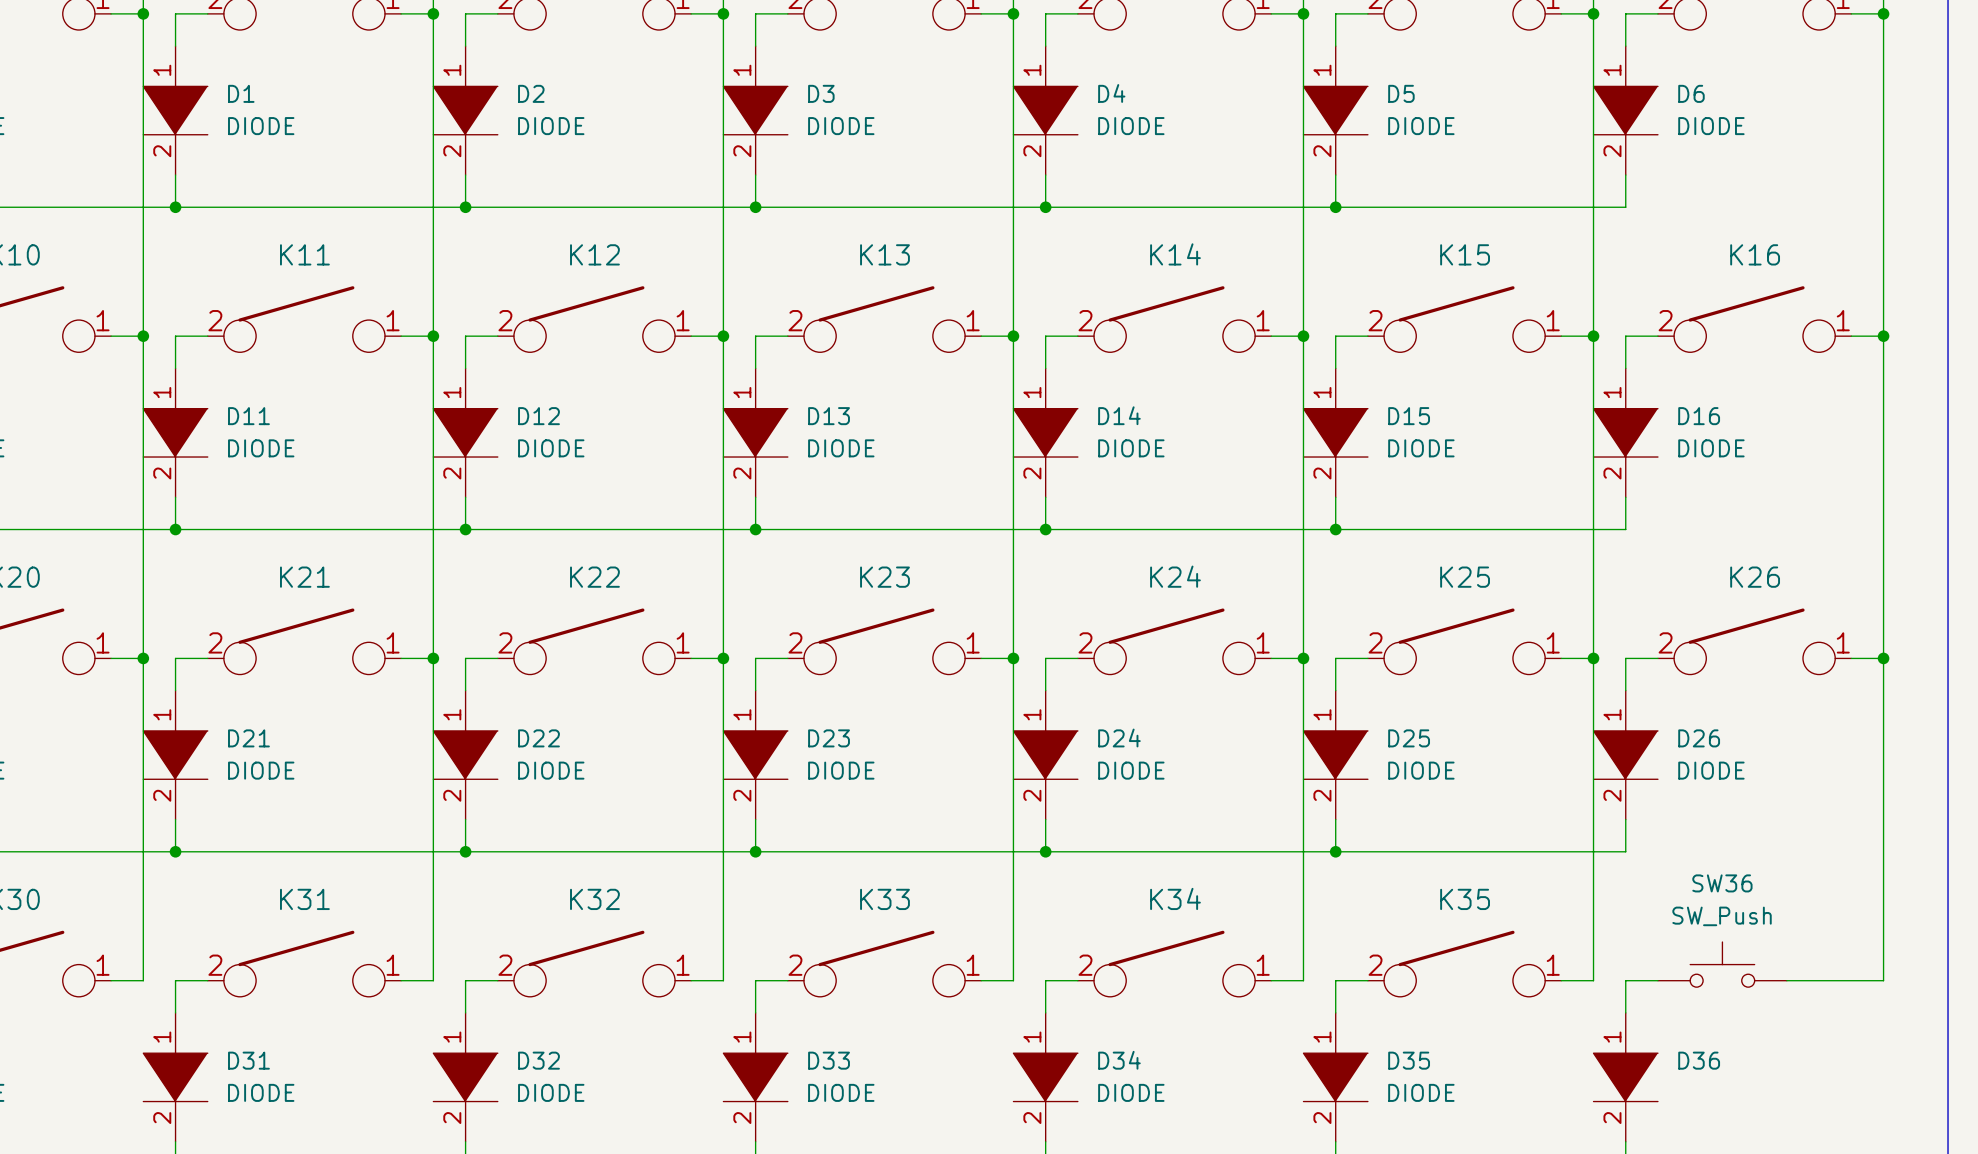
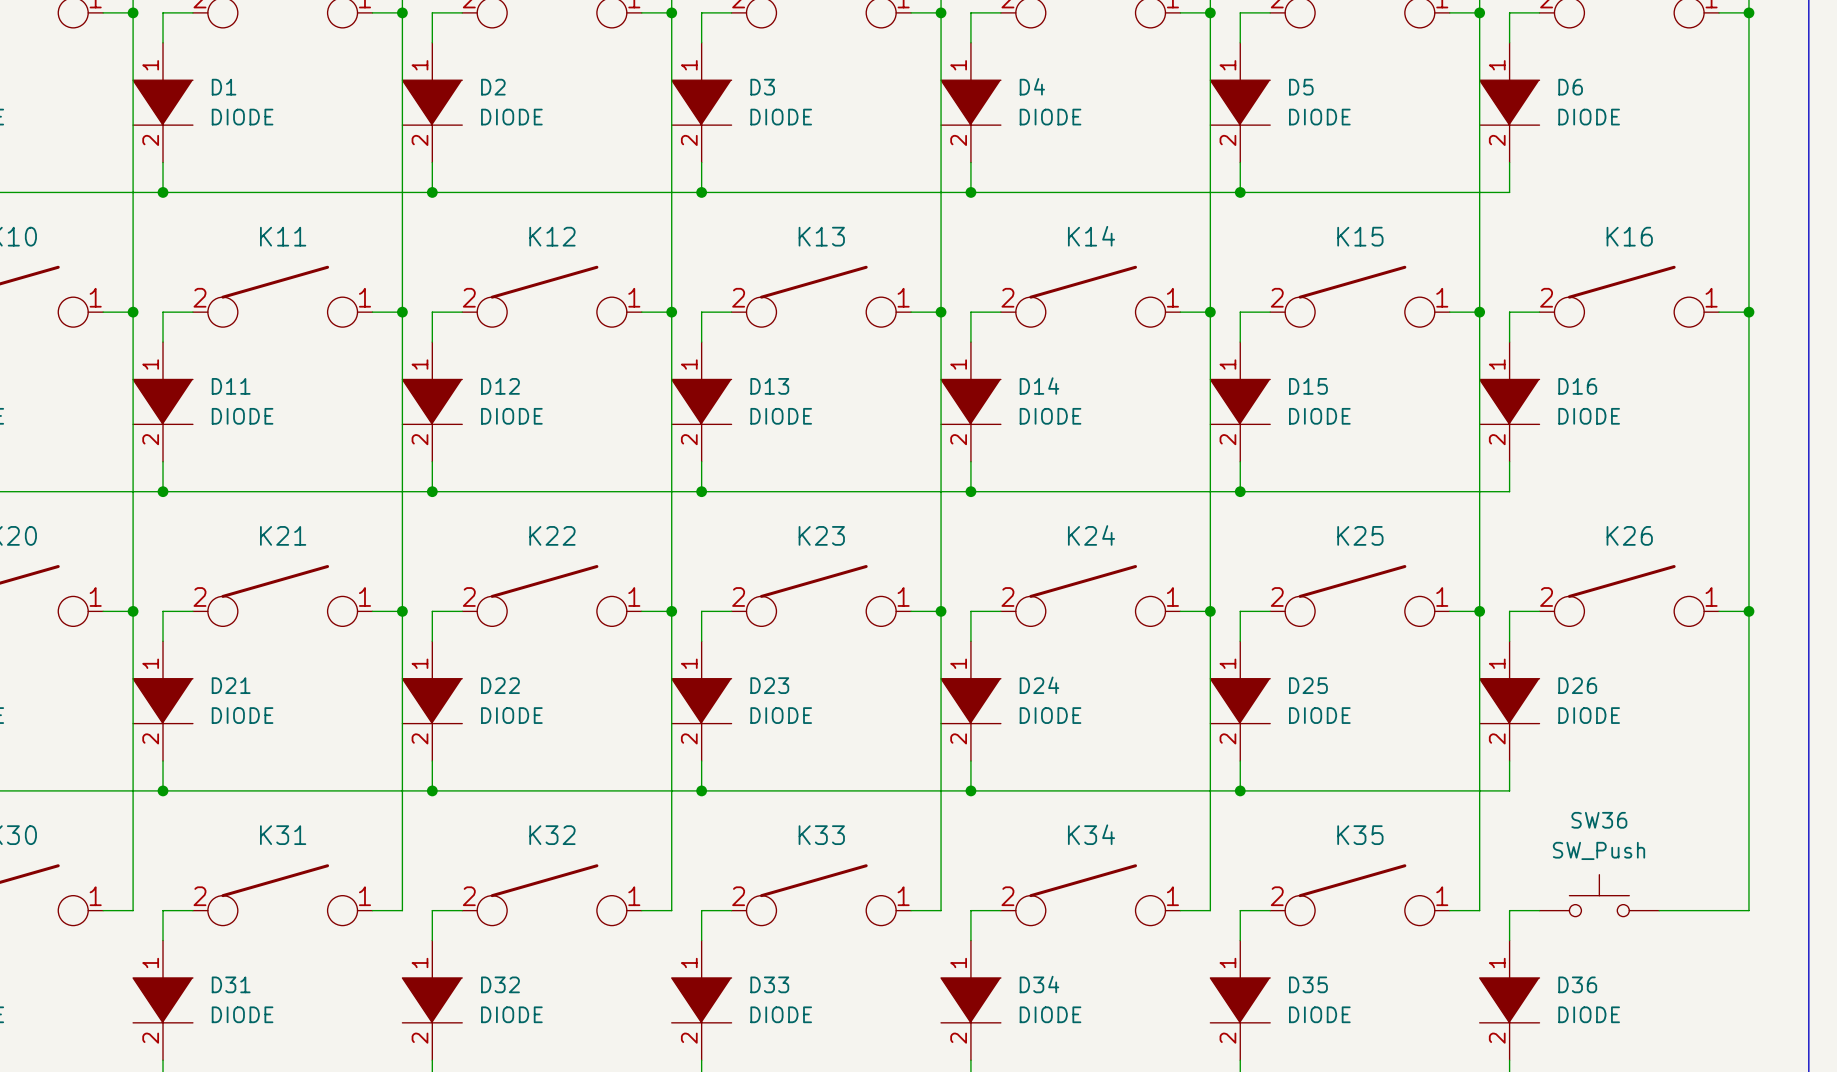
D36 value: none -> DIODE (1589, 1014)

